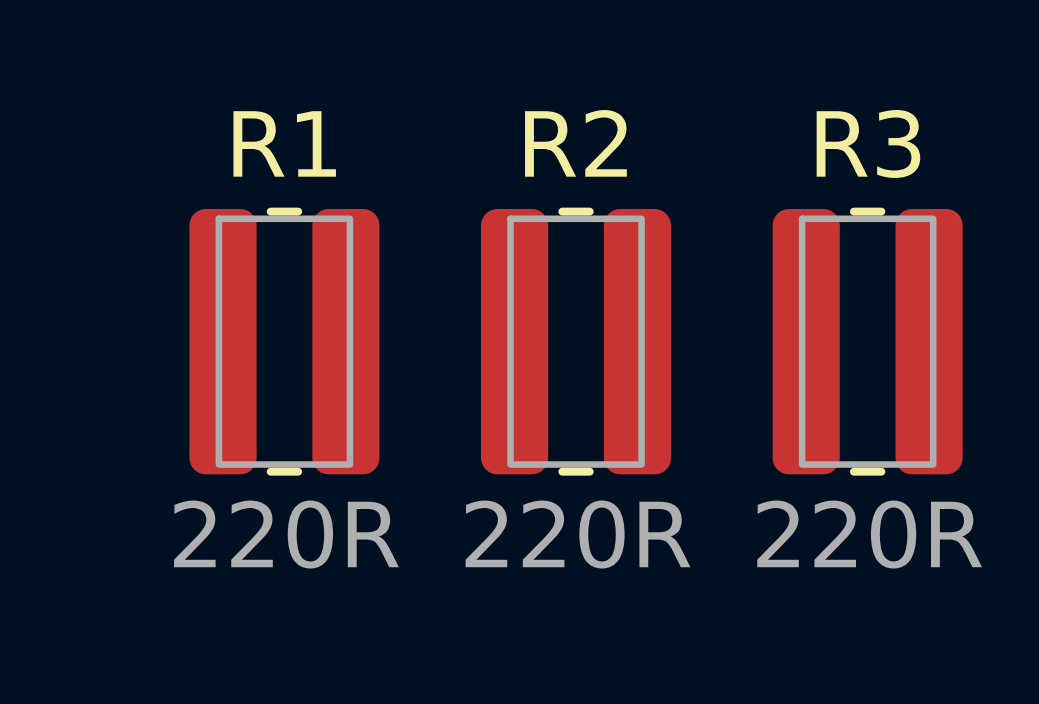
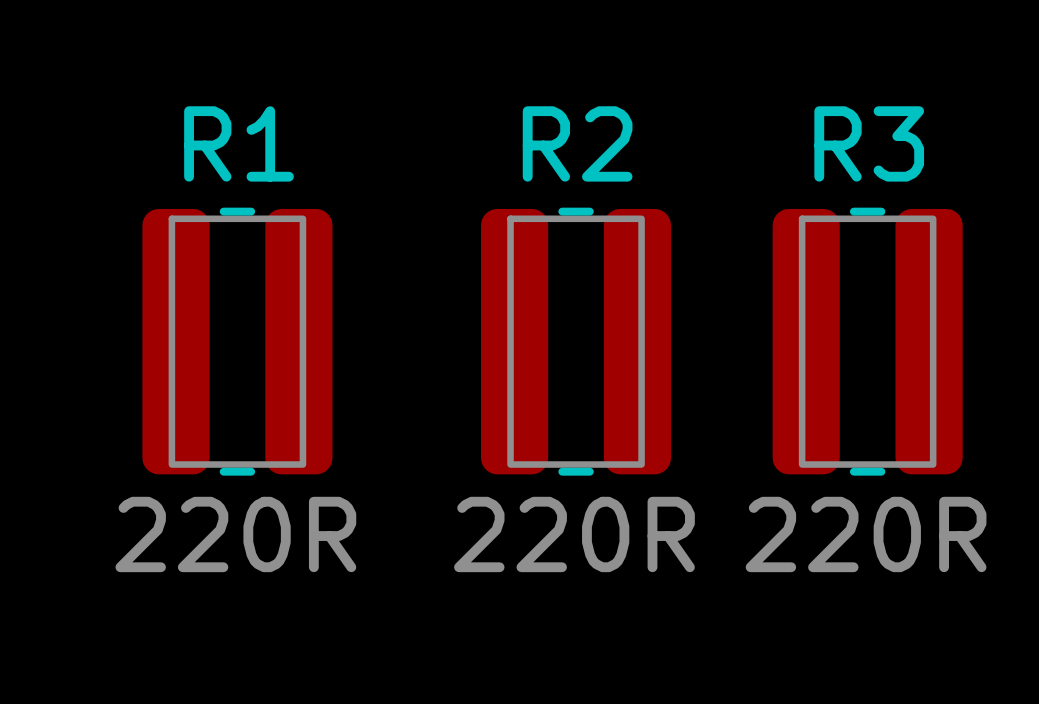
R1 position: (284, 341) -> (237, 341)

